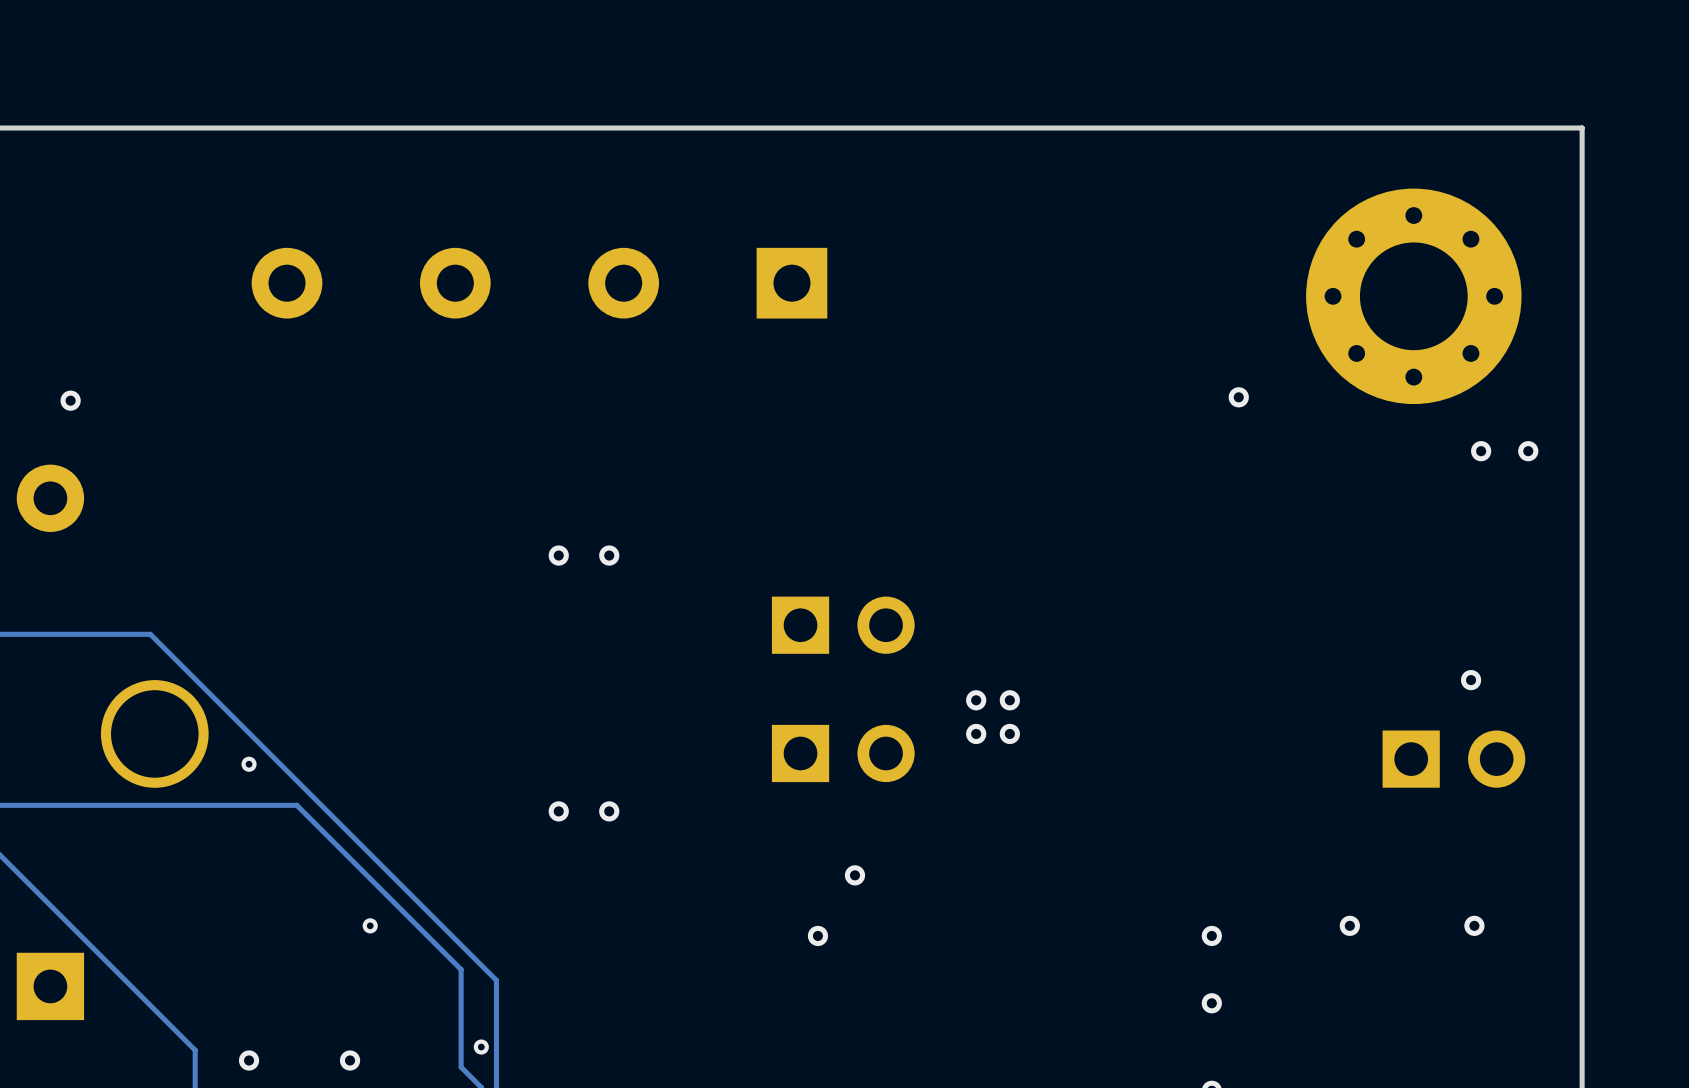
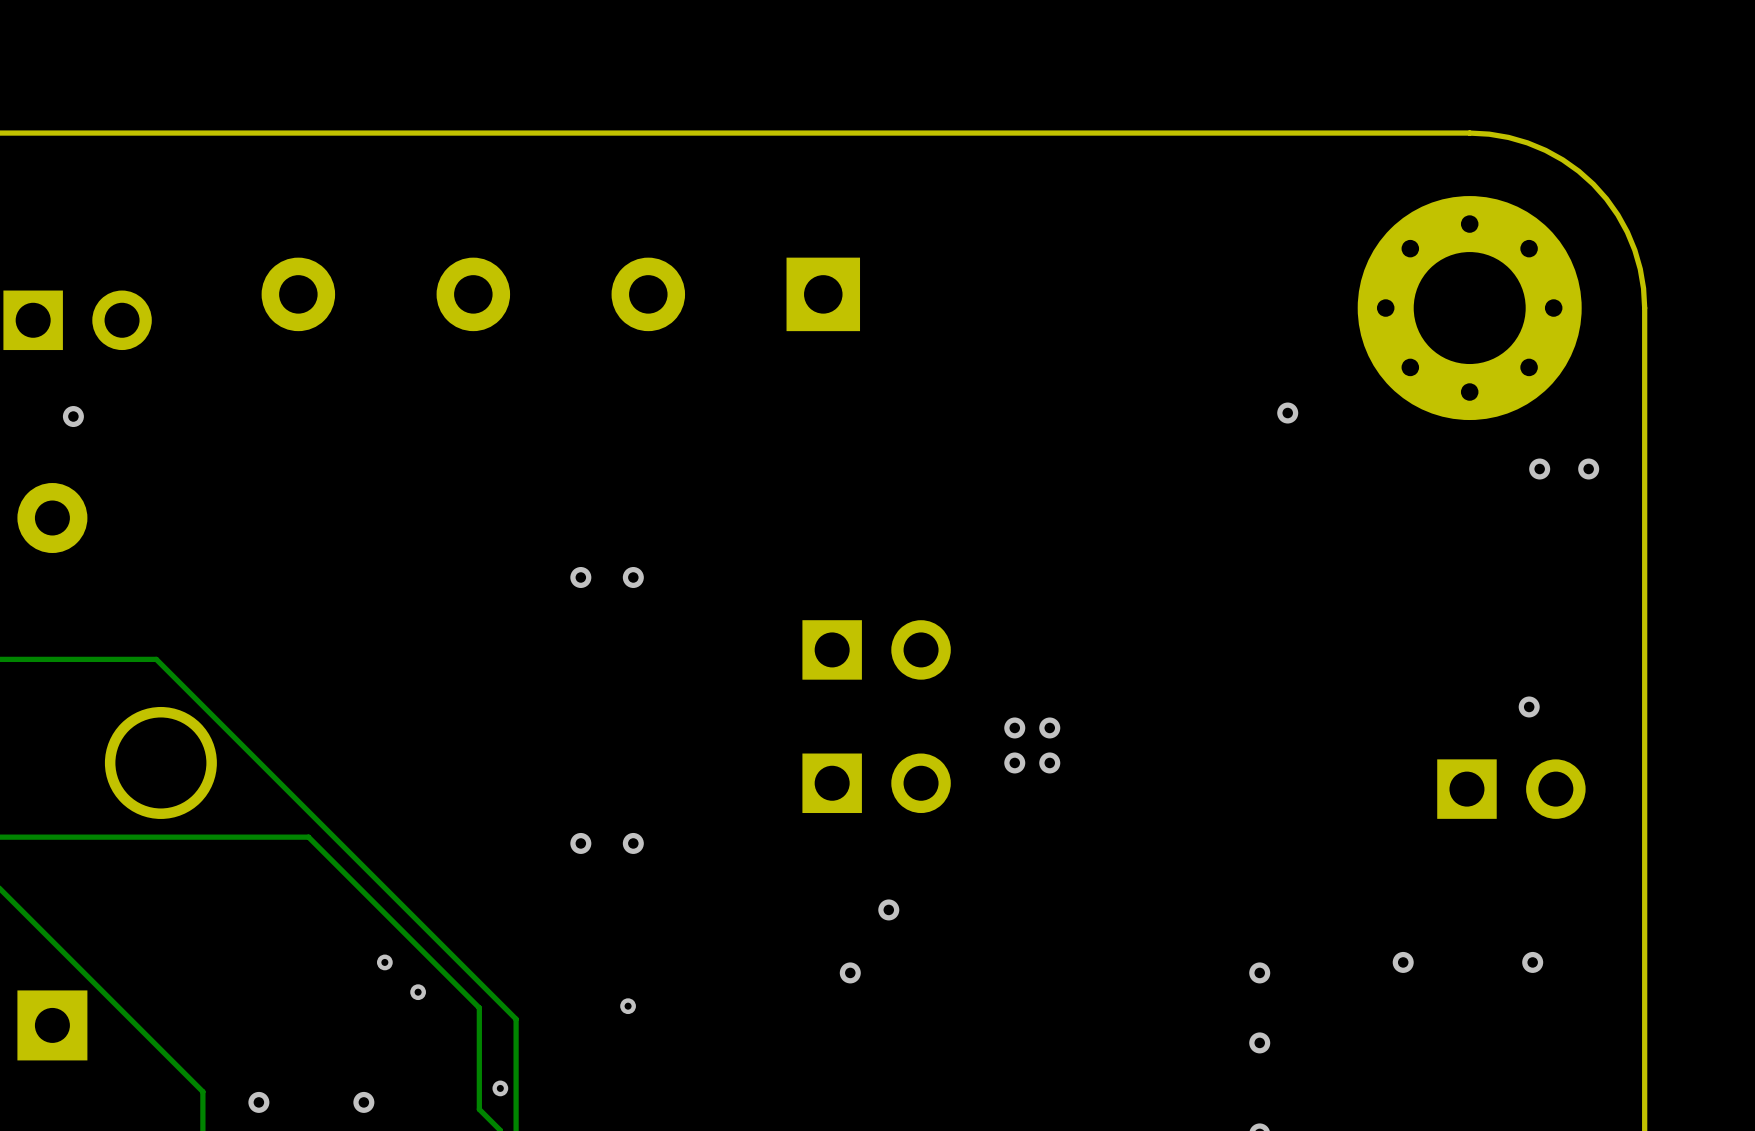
board edge: (1413, 128) (1582, 128) (1582, 296) -> (1469, 133) (1508, 137) (1545, 150) (1578, 171) (1593, 184) (1617, 214) (1634, 250) (1643, 288) (1644, 308)
part: none -> (77, 320)
via: (249, 764) -> none
via: none -> (418, 992)
via: none -> (628, 1006)

